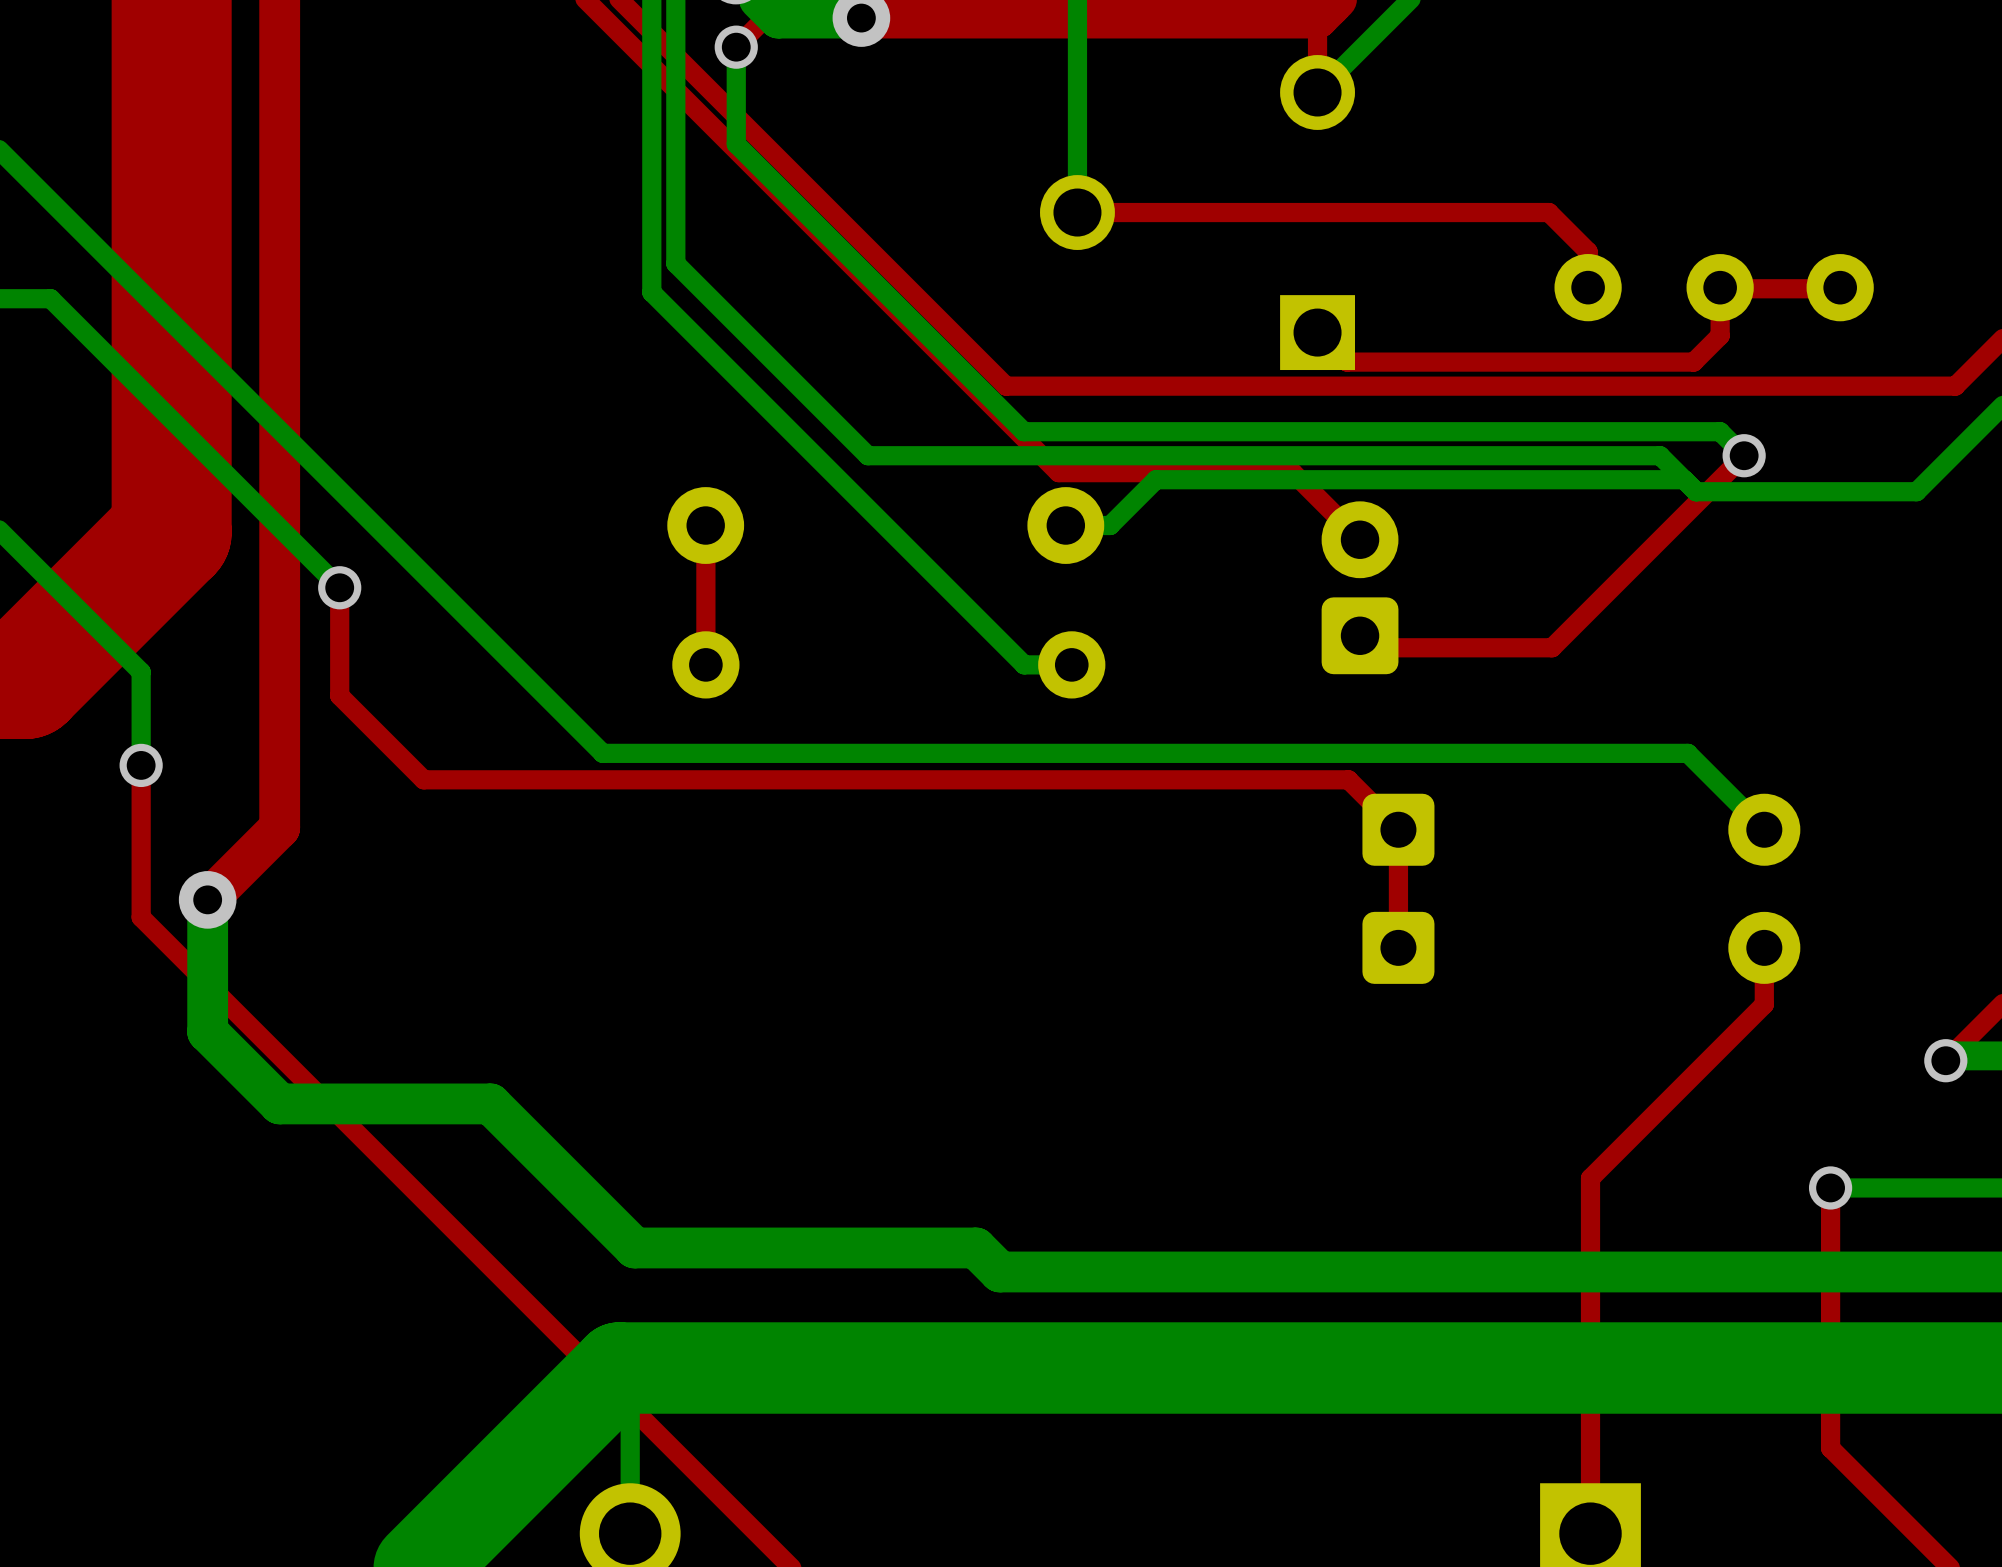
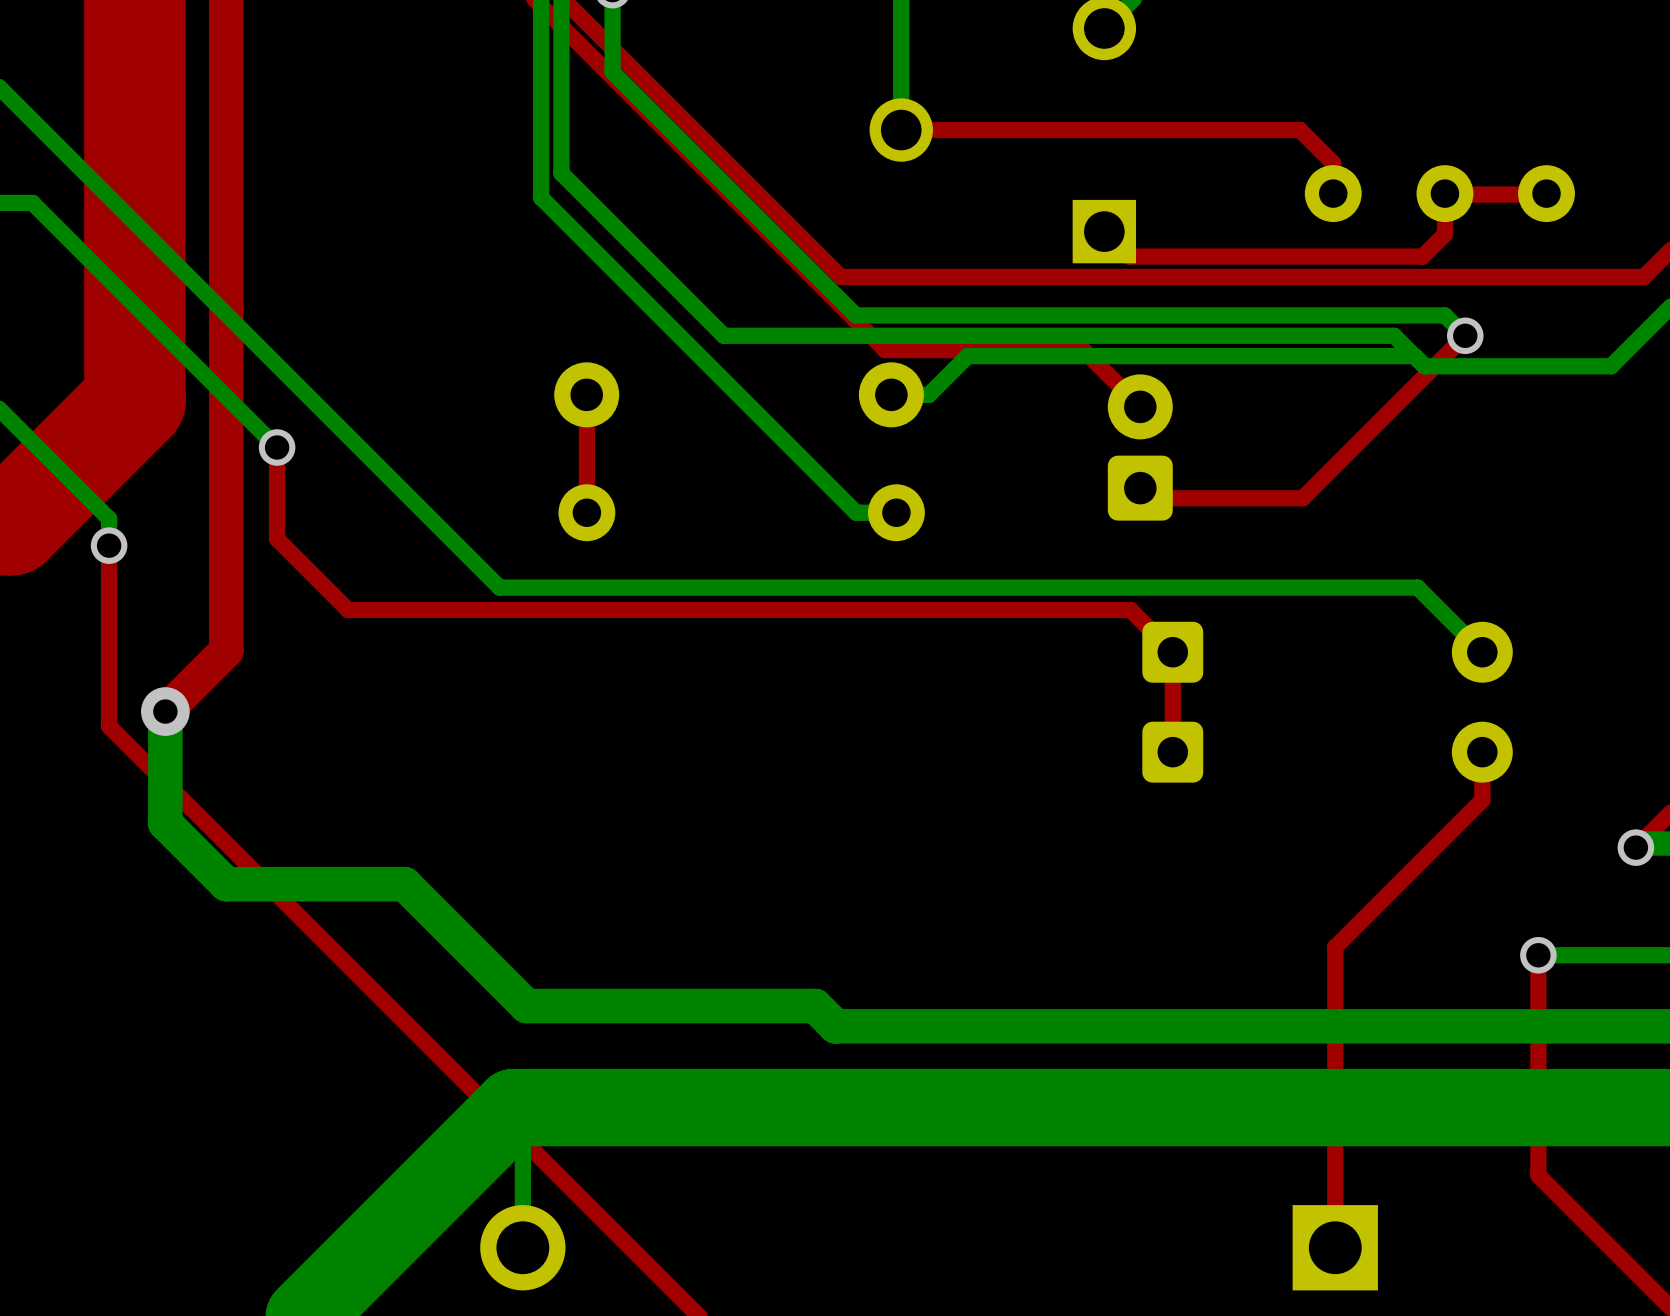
top track: none -> (109, 545) (109, 597)
bottom track: (141, 703) (141, 765) -> none
via position: (141, 765) -> (109, 545)

